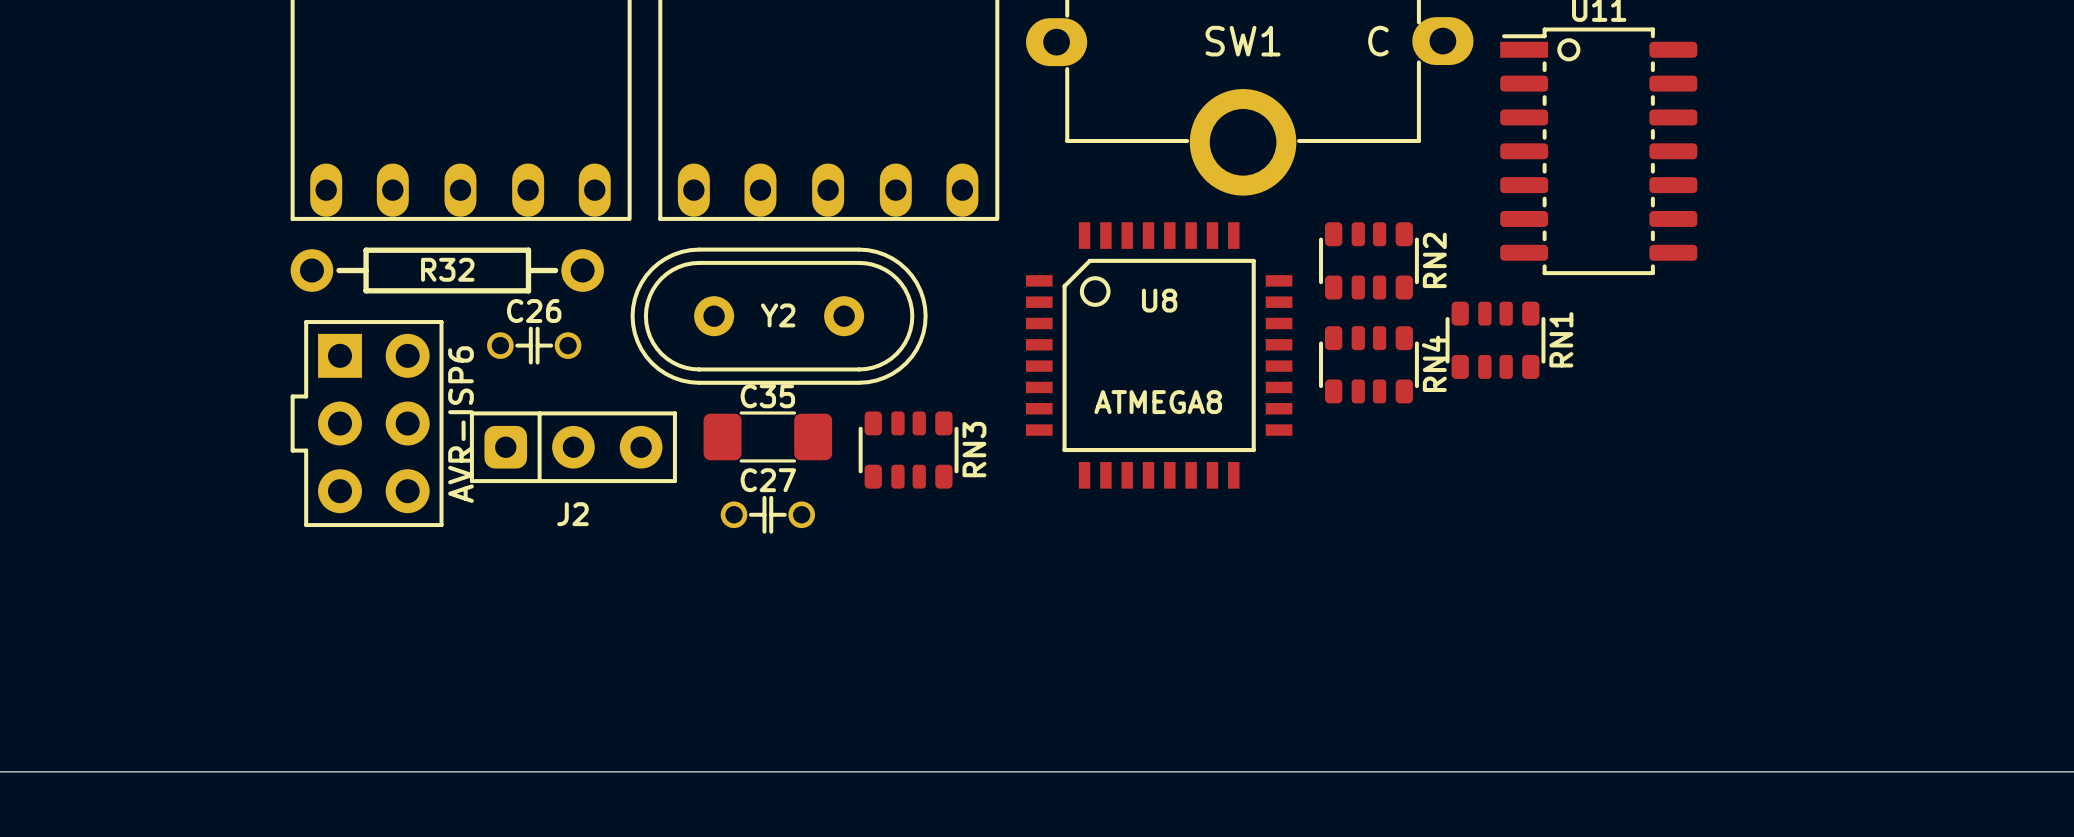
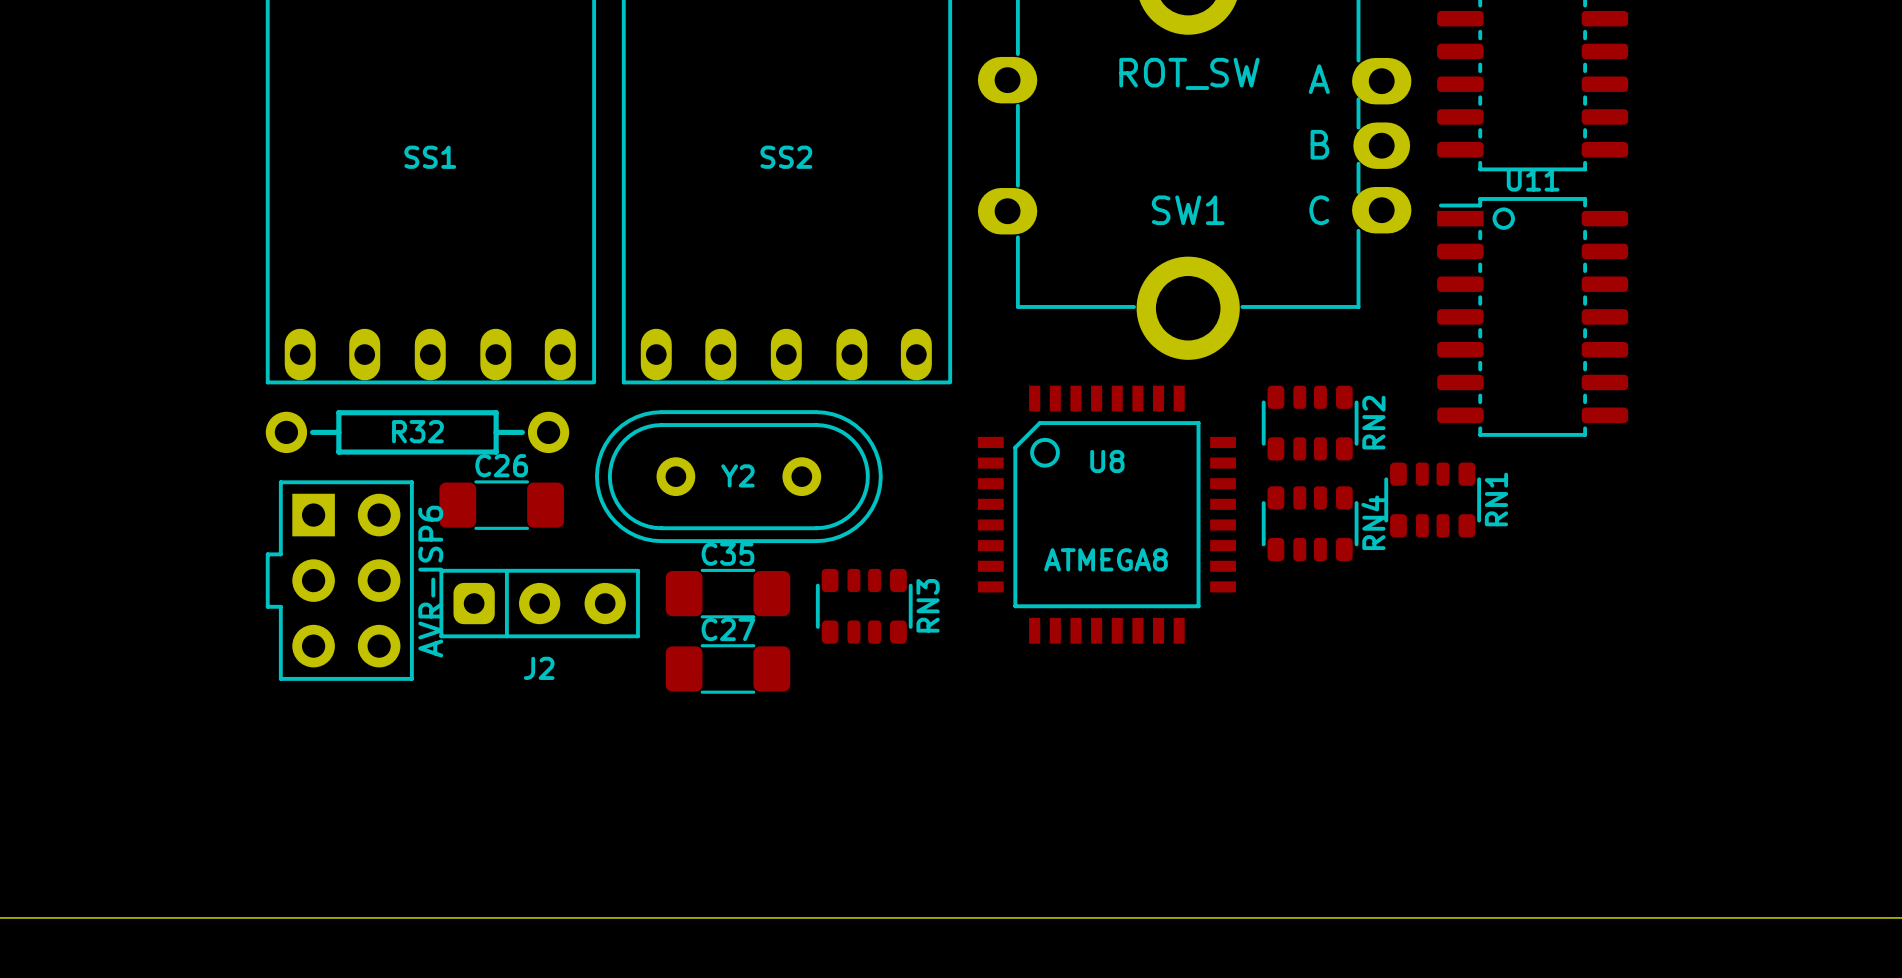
C26 footprint: [487, 326, 582, 365] -> [439, 480, 564, 530]
C27 footprint: [720, 495, 816, 534] -> [665, 644, 791, 694]

